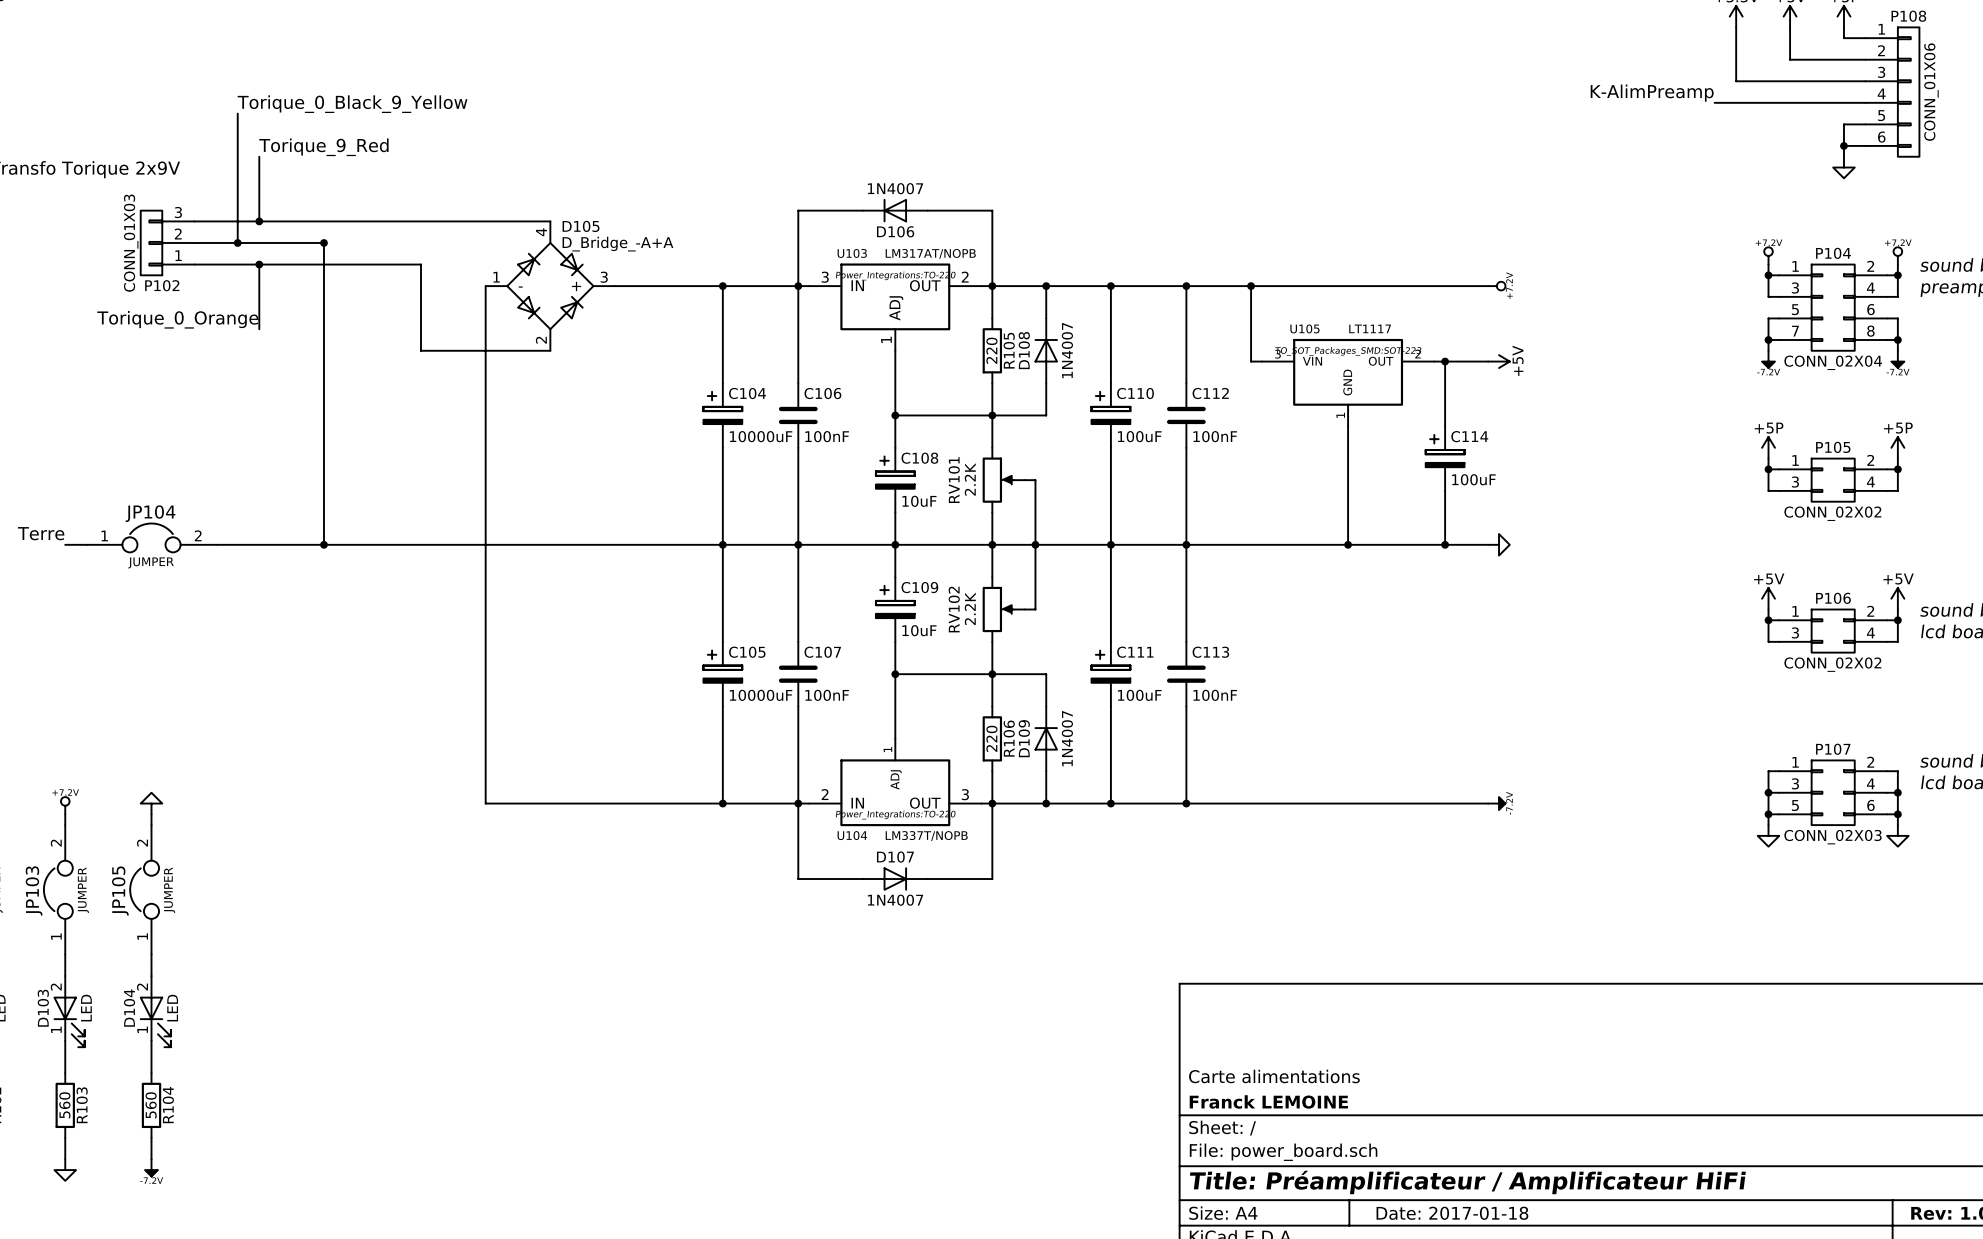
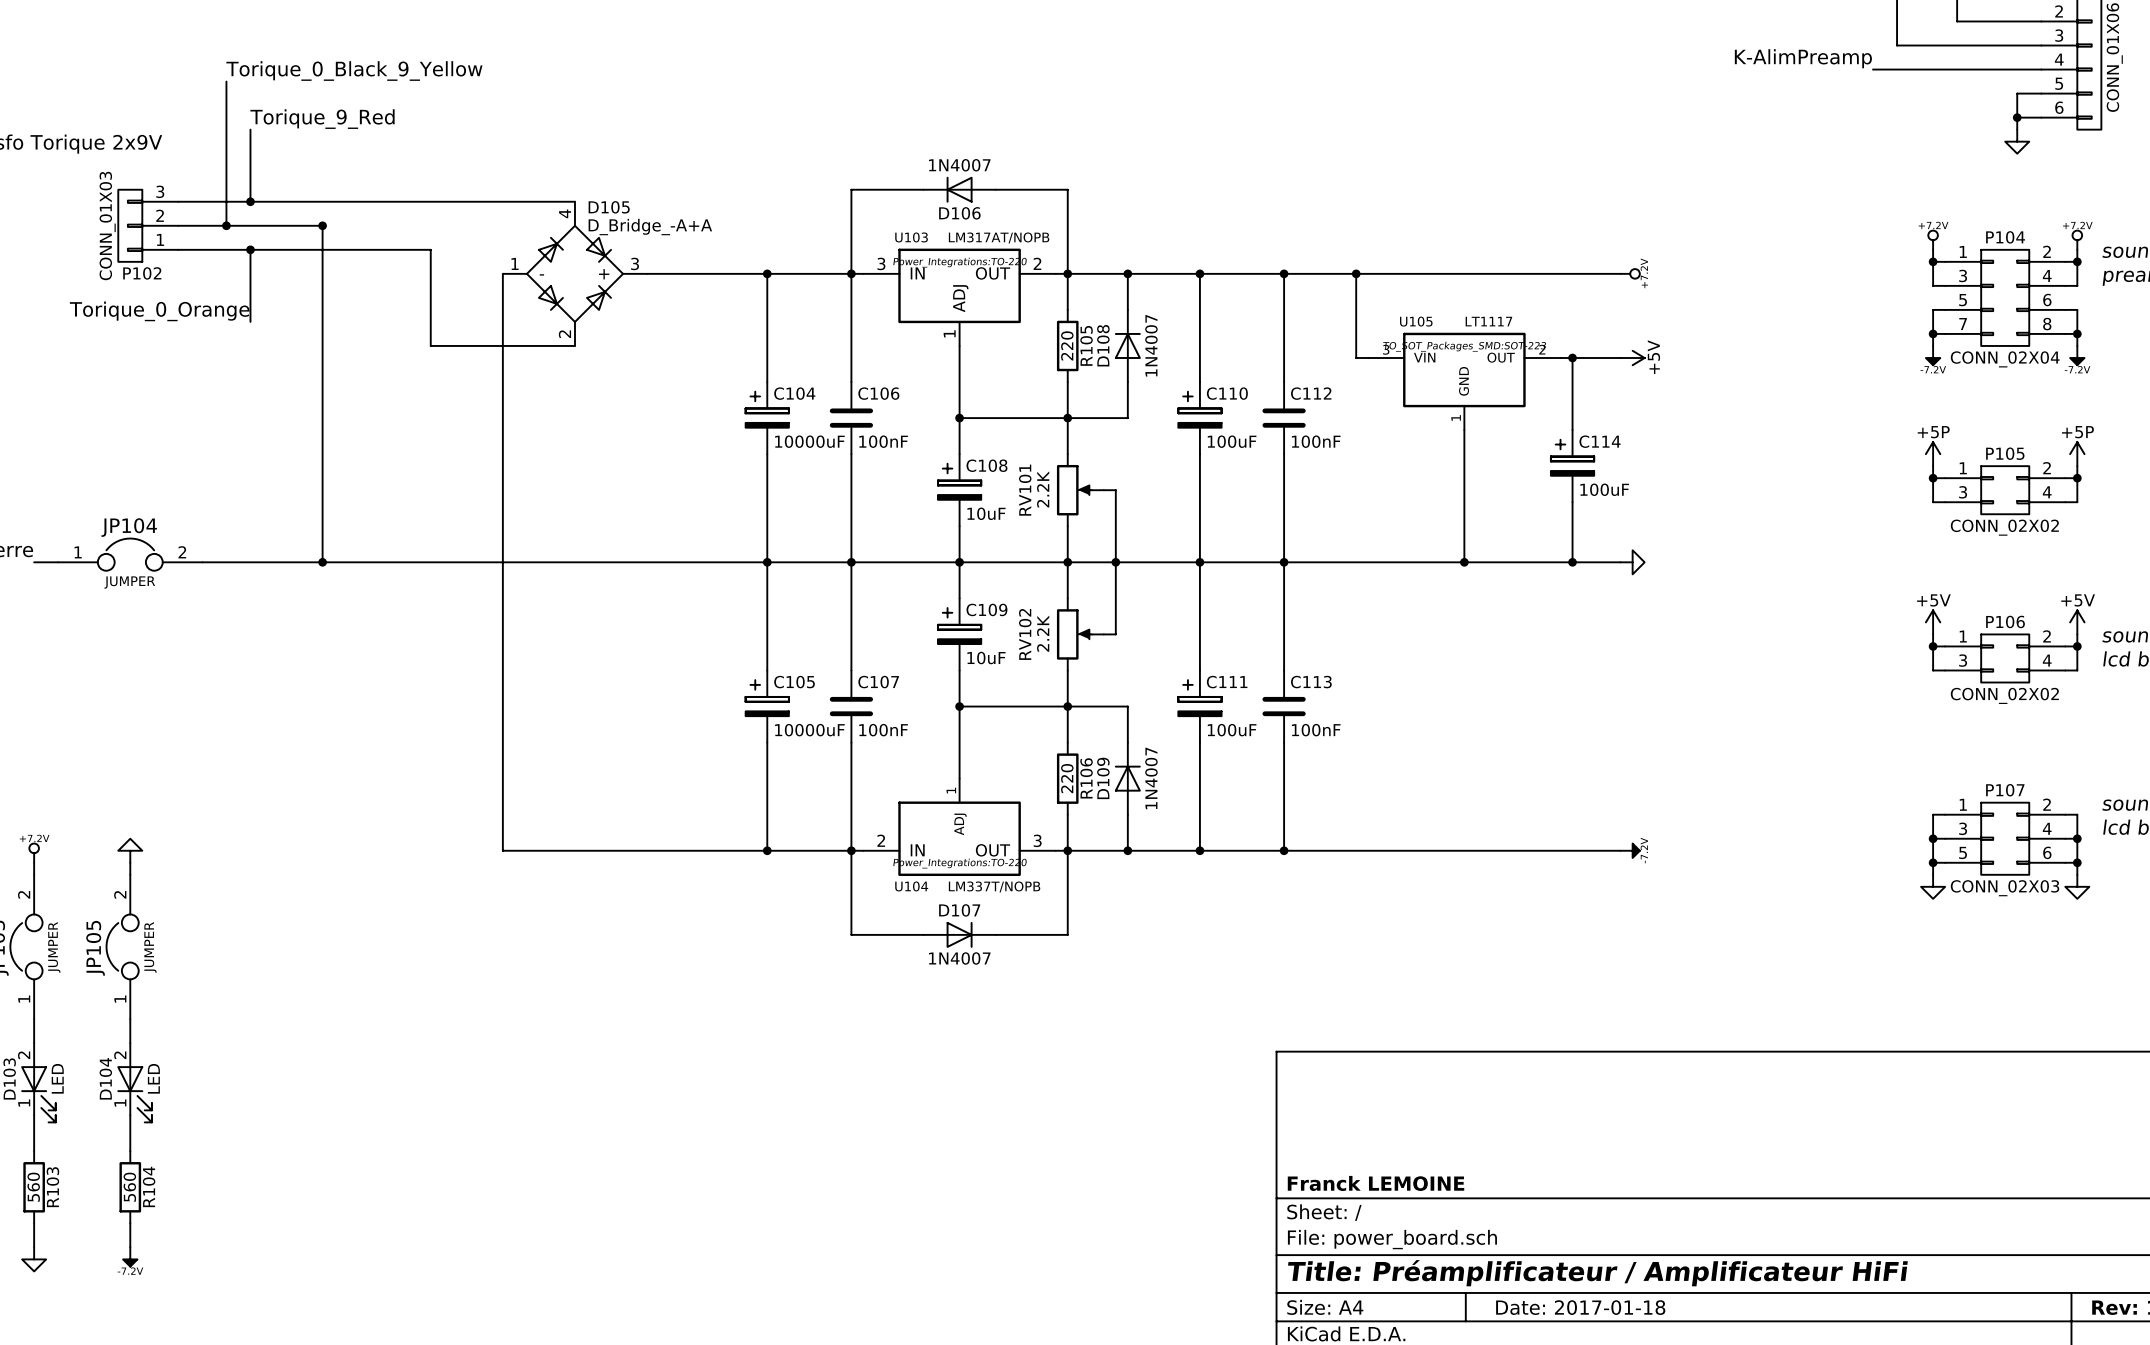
title block: Carte alimentations (1274, 1076) -> none

